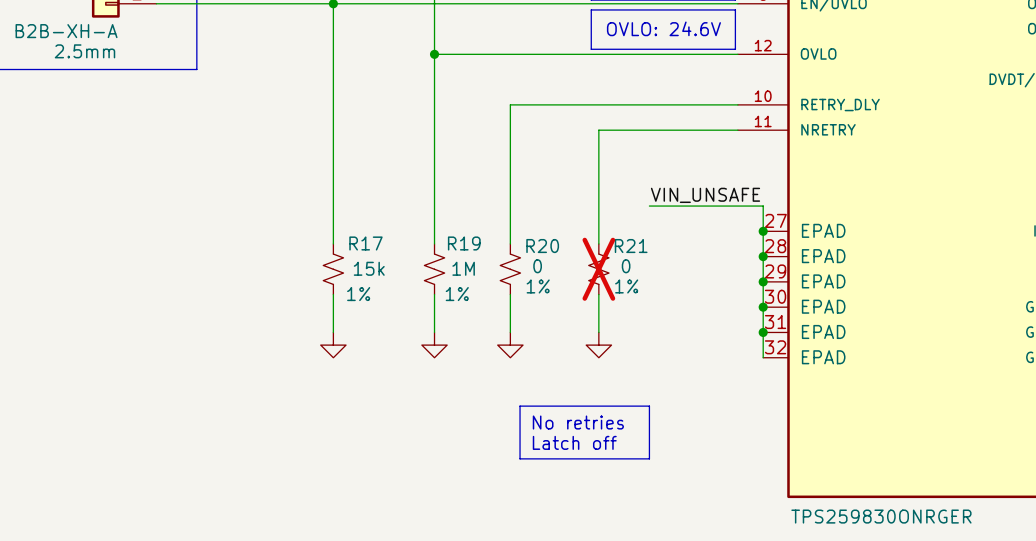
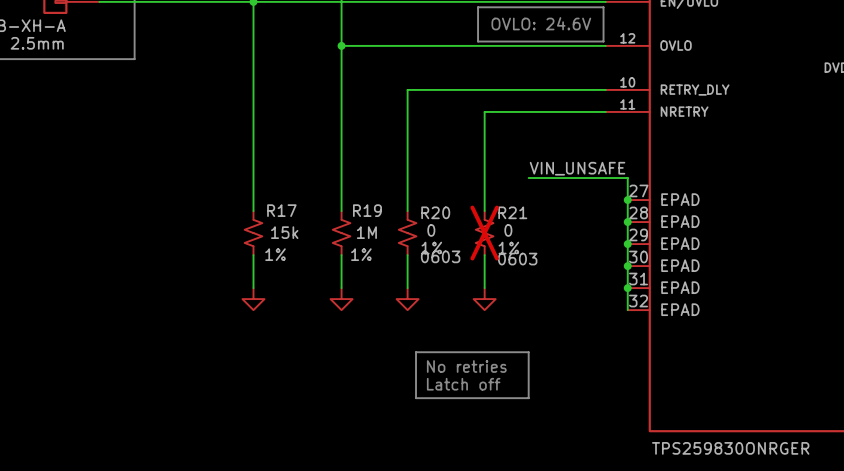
R20 text: none -> 0603 (440, 256)
R21 text: none -> 0603 (517, 259)

